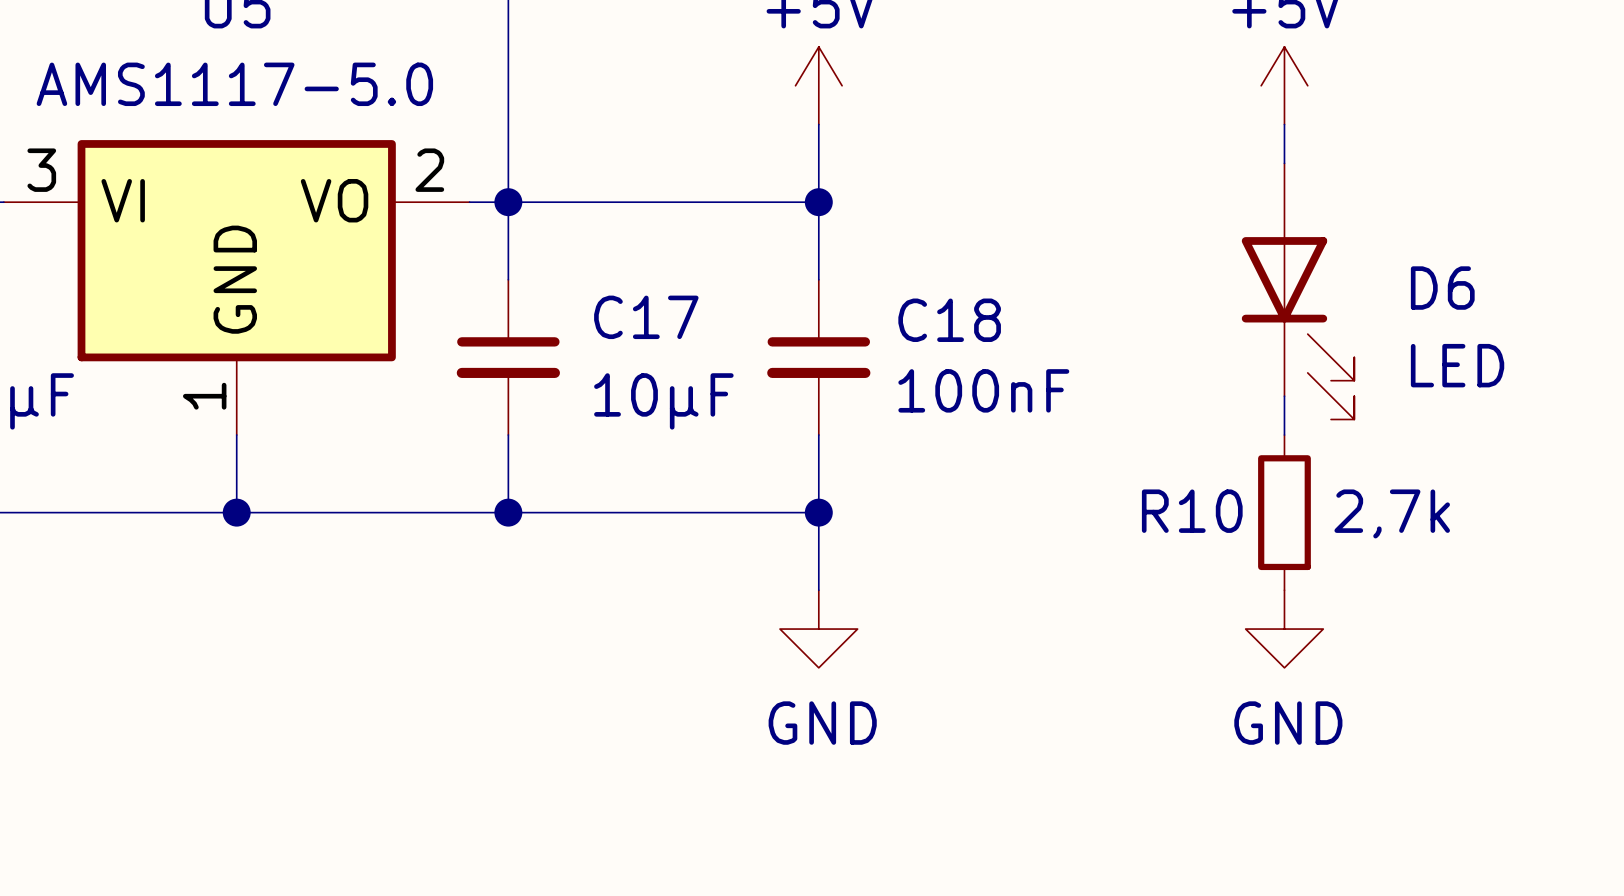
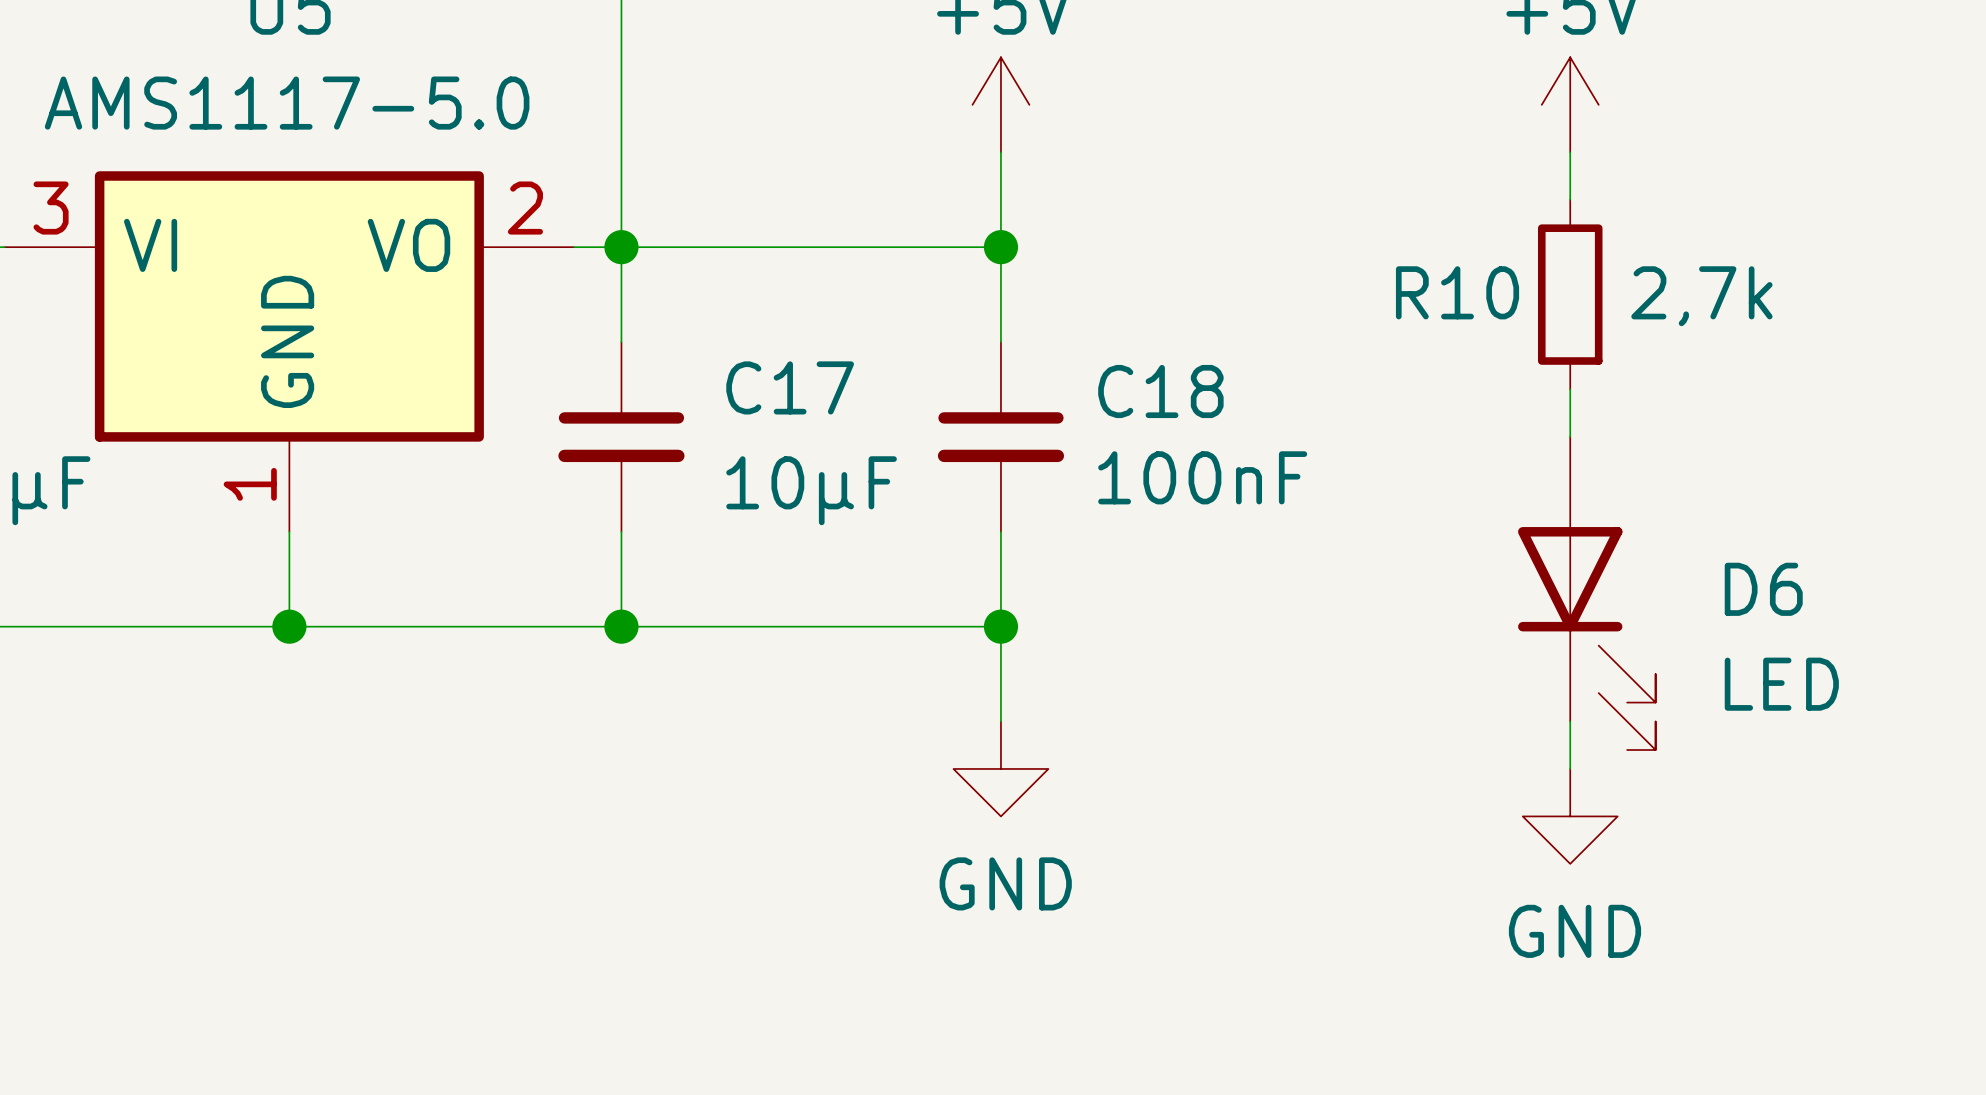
D6 position: (1298, 291) -> (1586, 593)
R10 position: (1284, 512) -> (1570, 294)
power symbol position: GND (1284, 629) -> GND (1570, 816)

